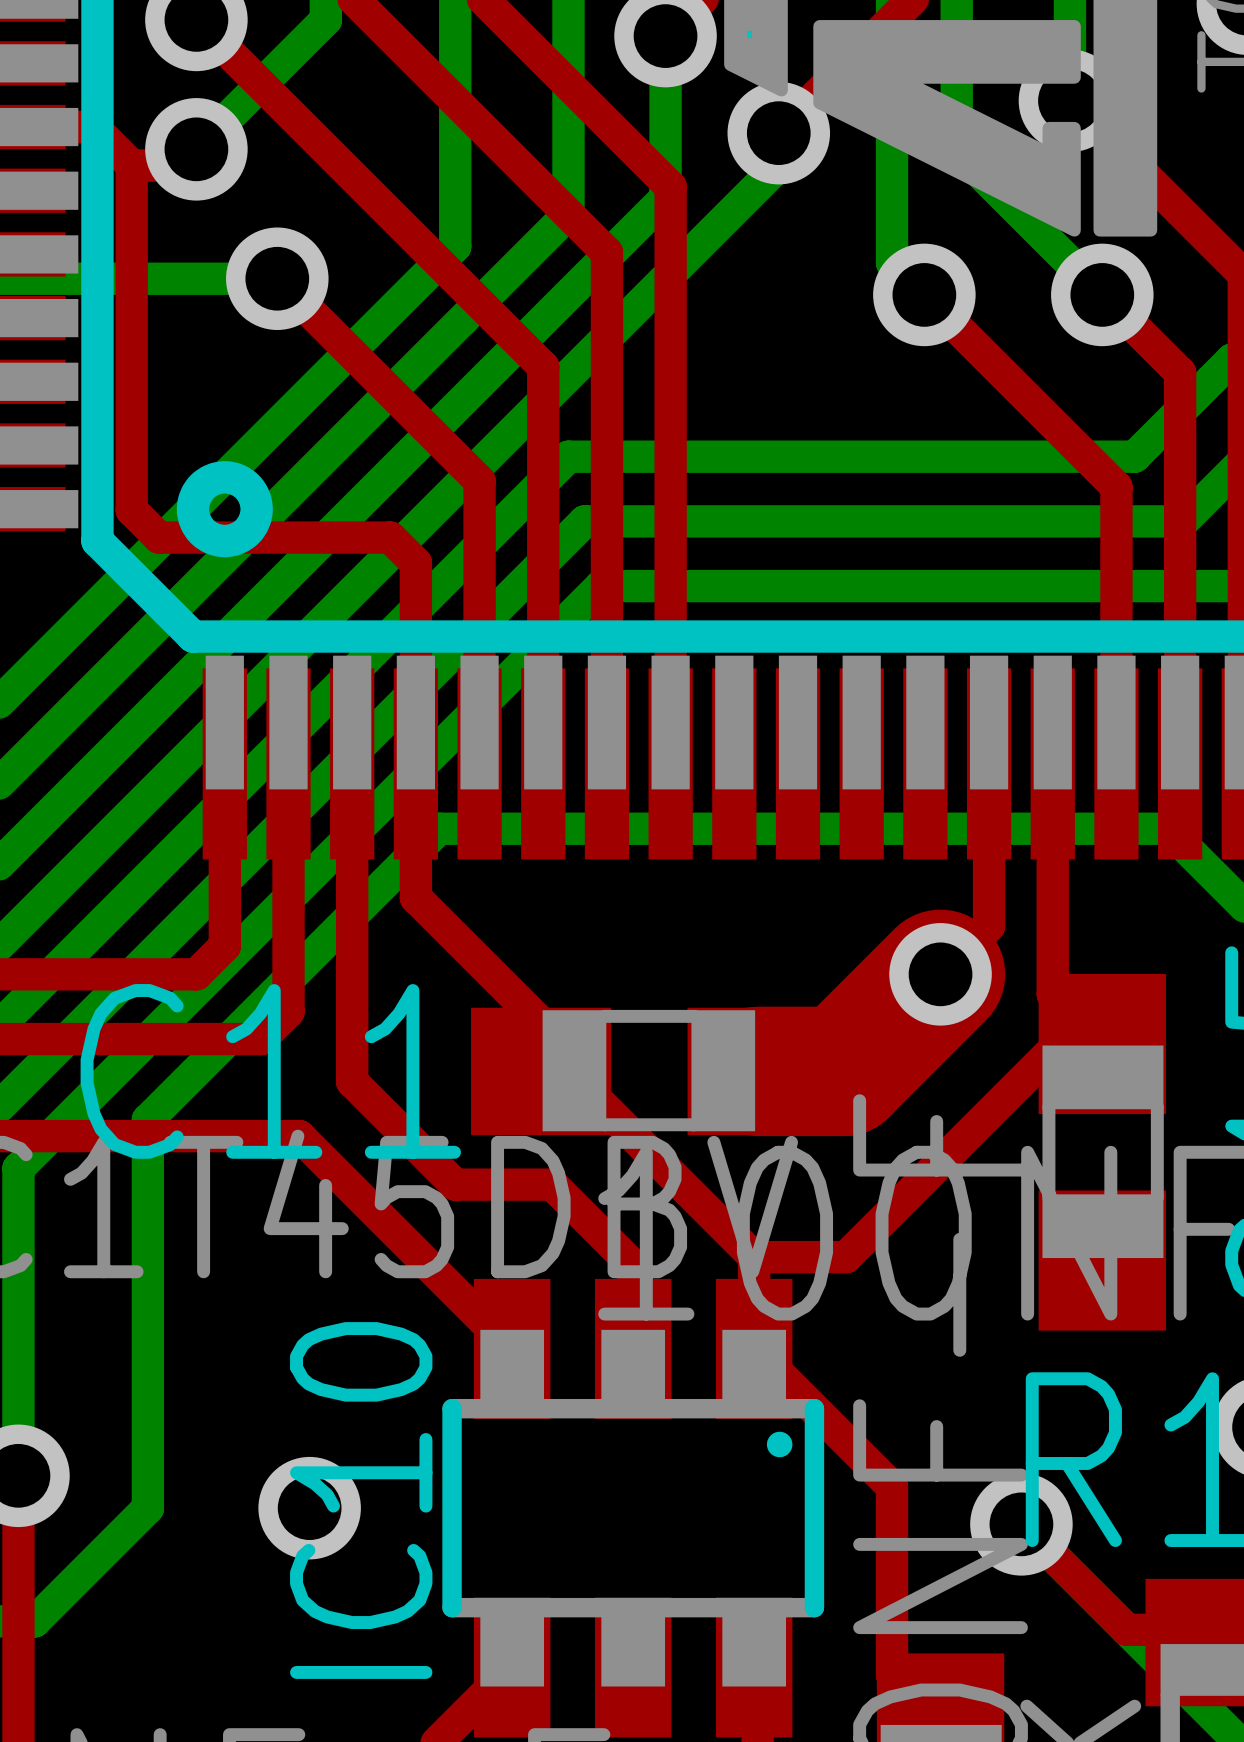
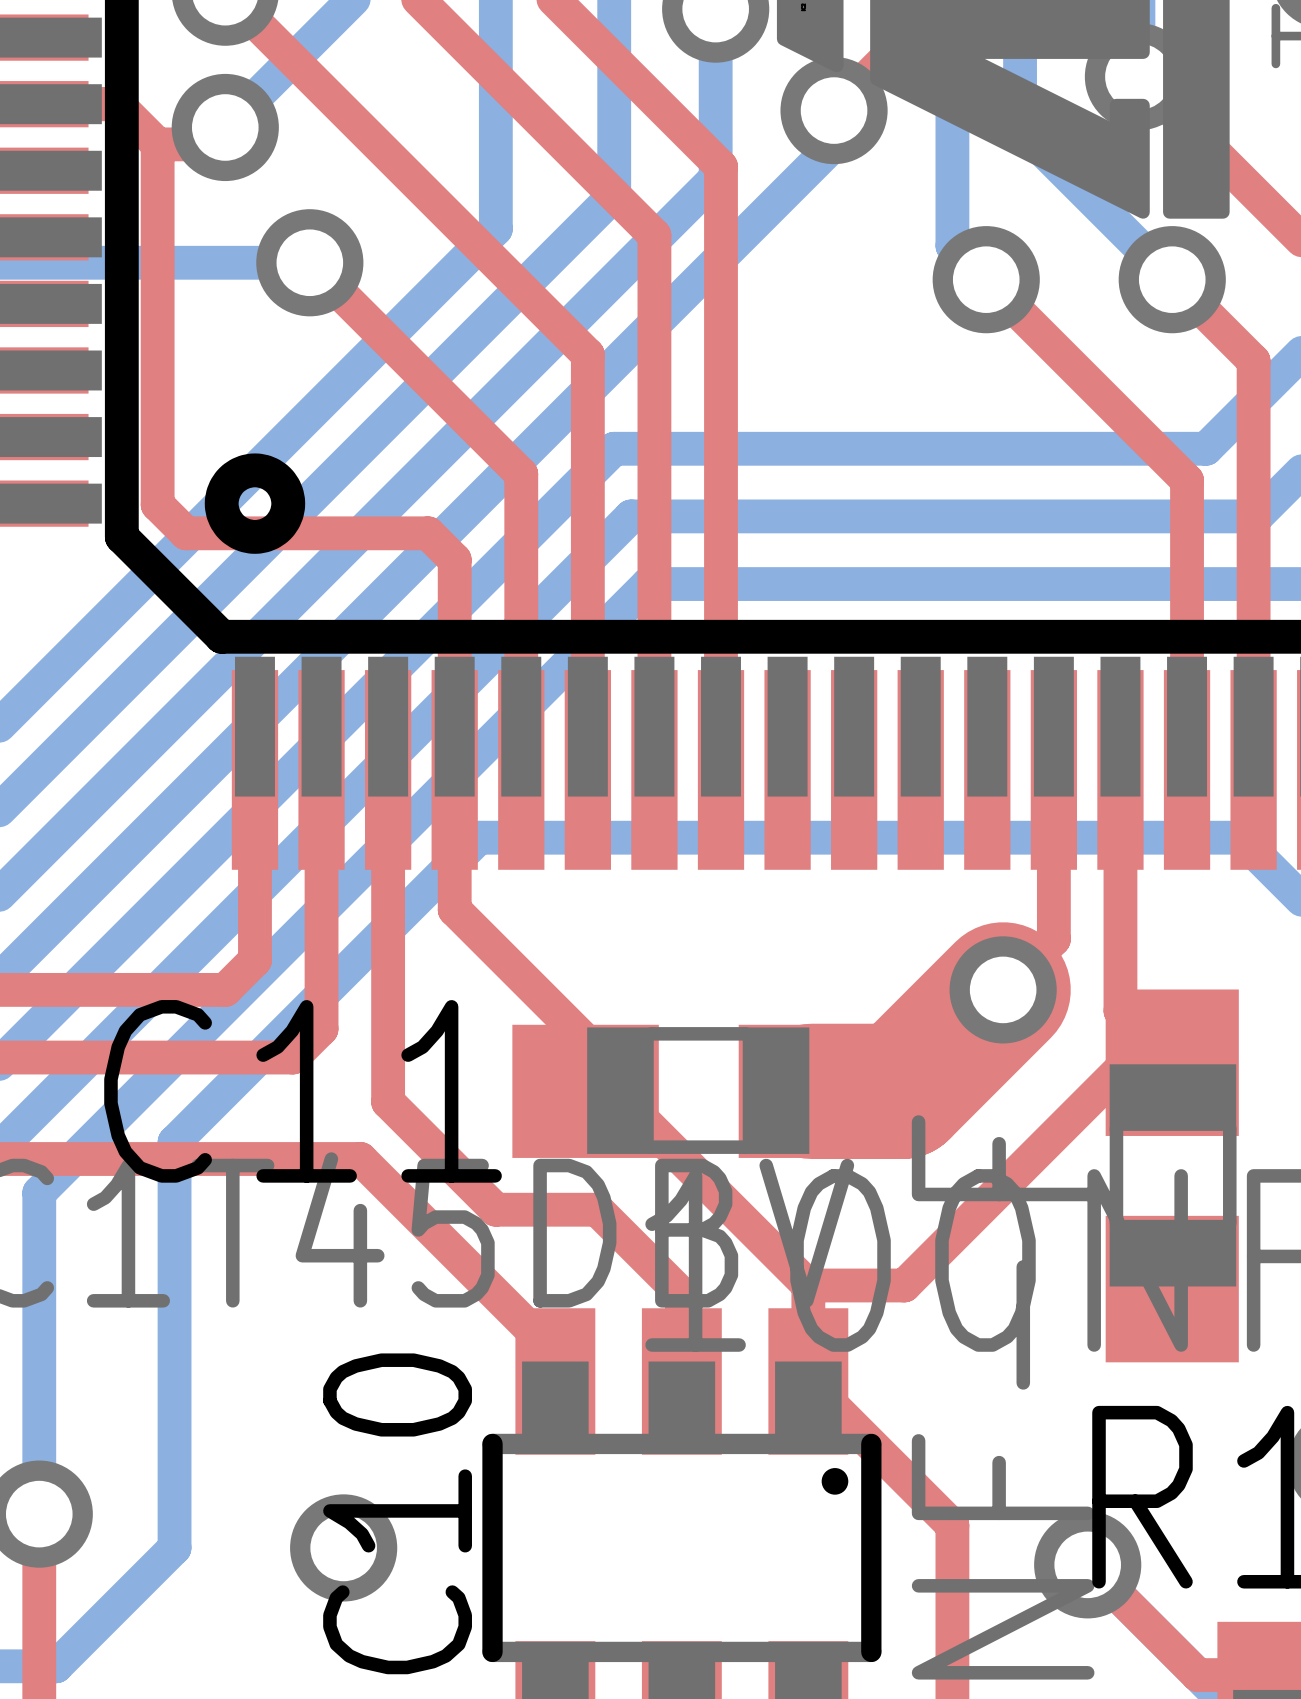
top track: (299, 1136) (512, 1348) -> (332, 1159) (360, 1159) (555, 1353) (555, 1381)

